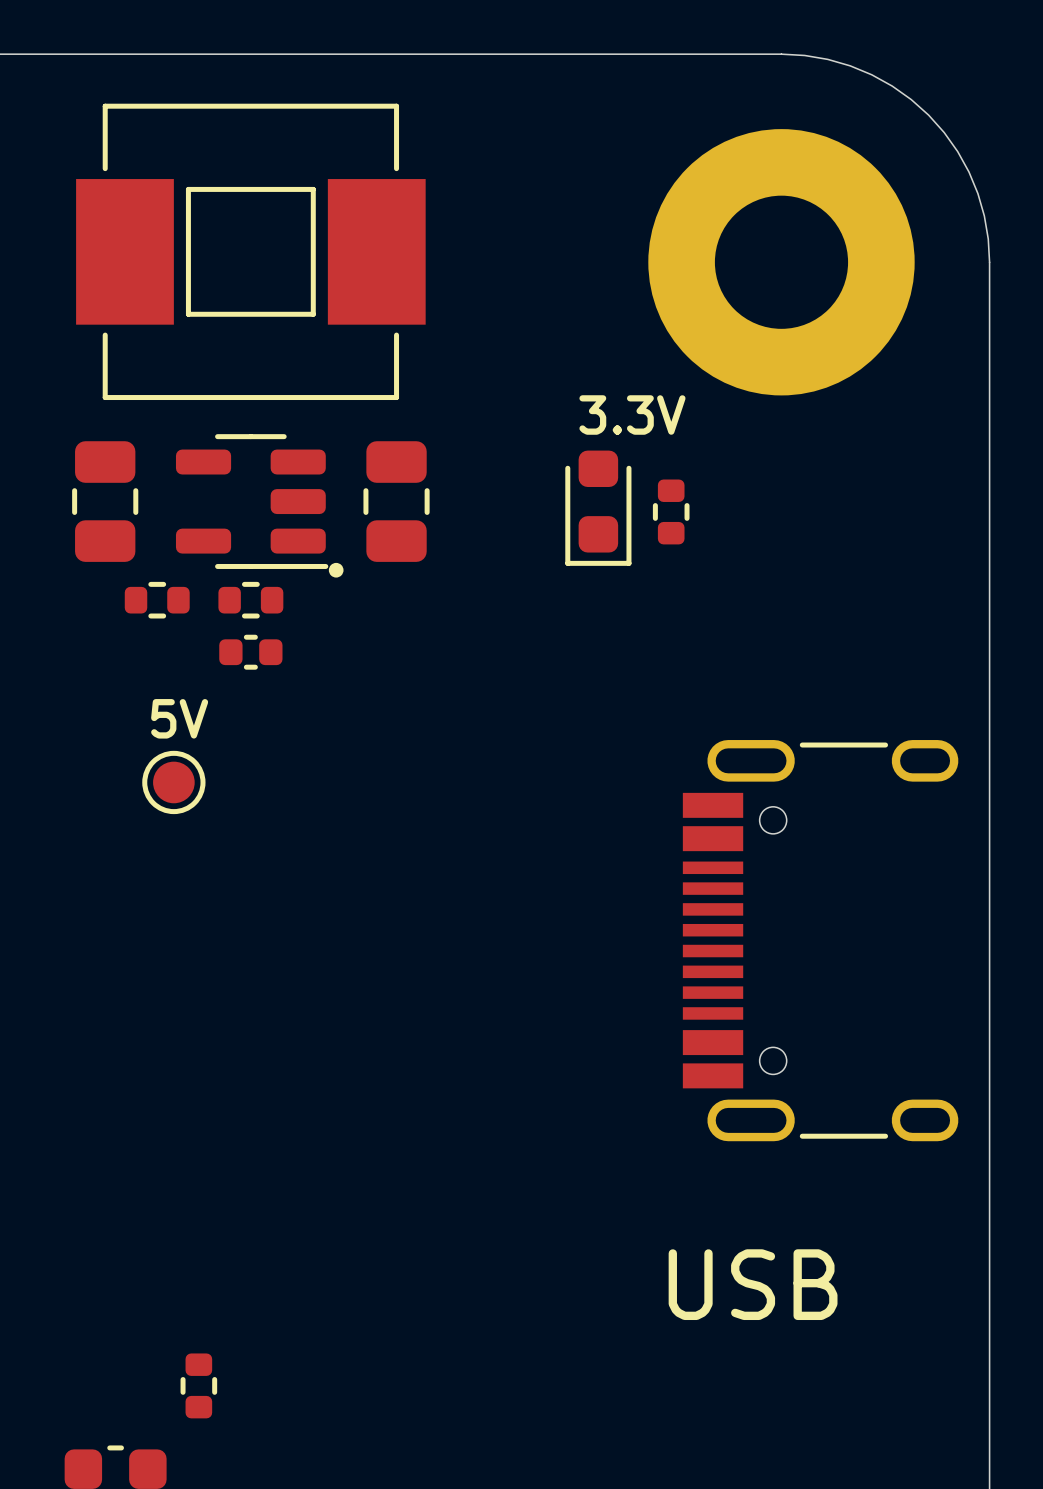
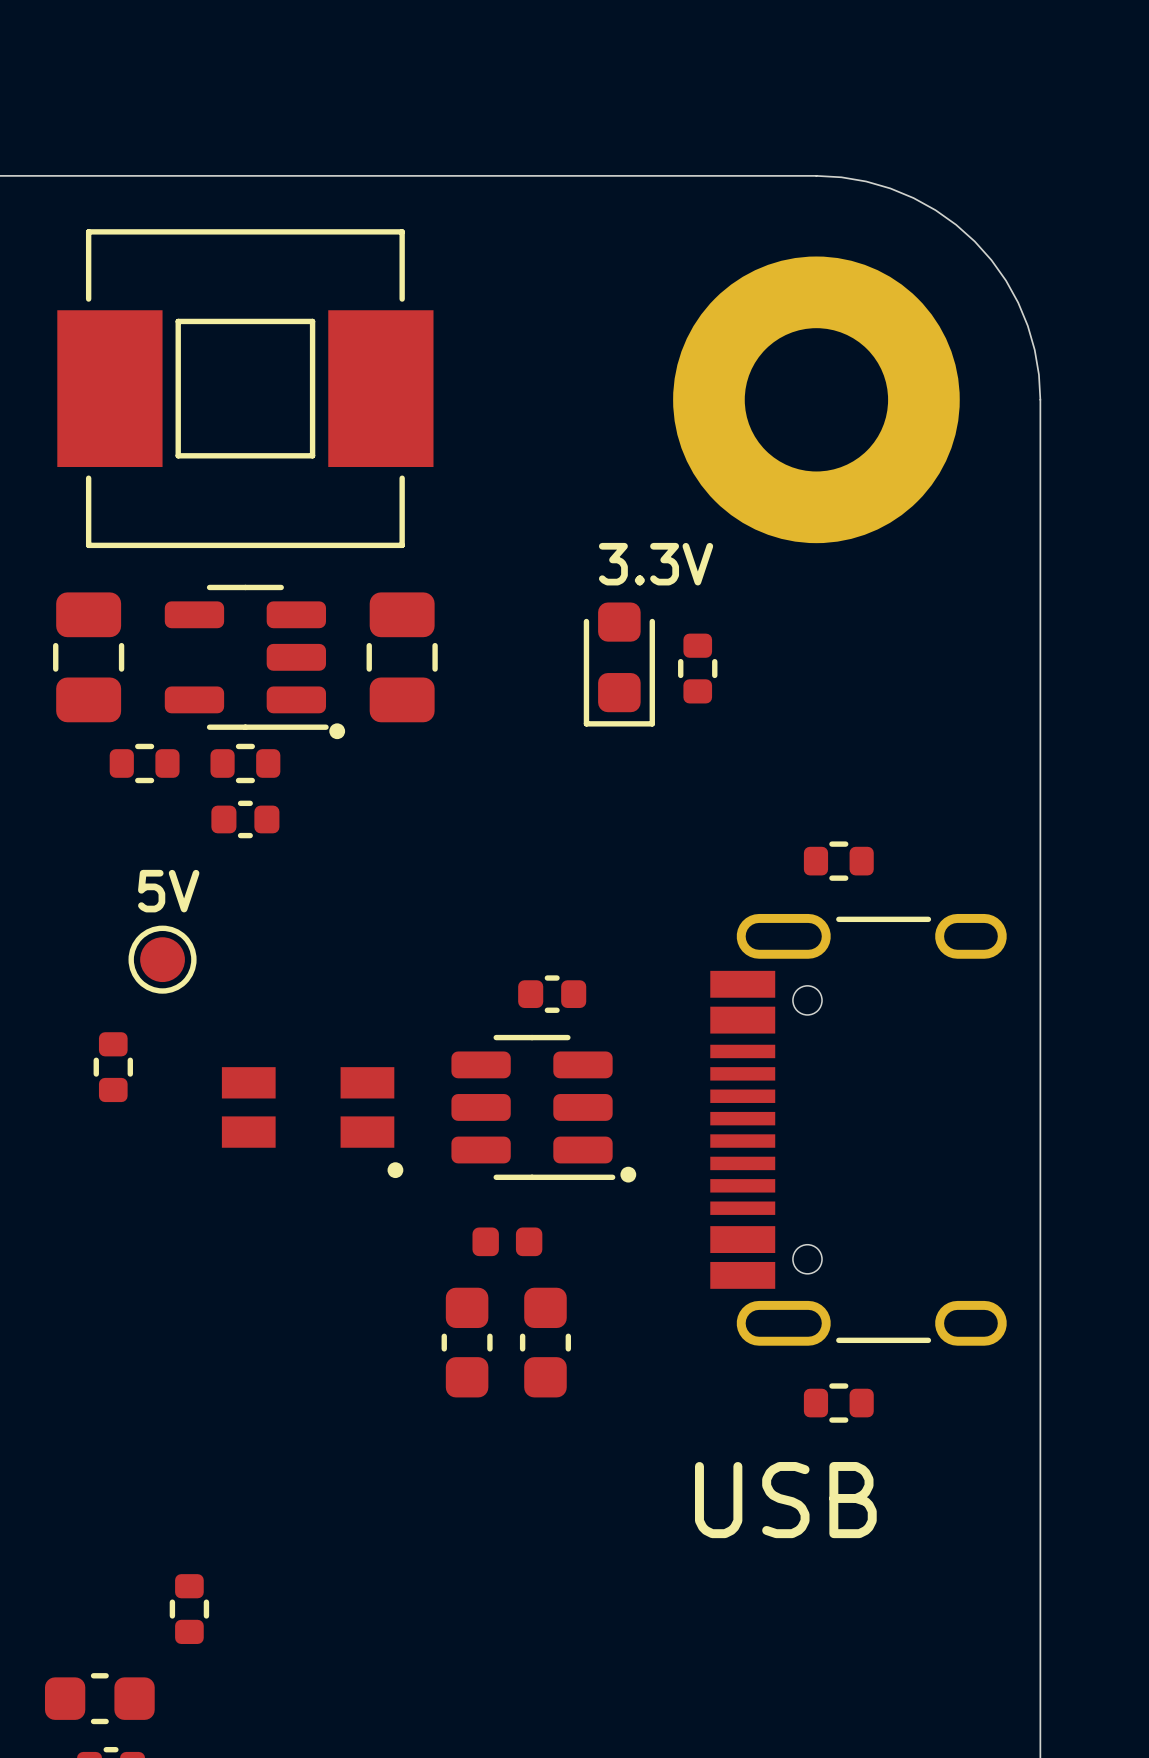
part: none -> (838, 861)
part: none -> (552, 994)
part: none -> (113, 1067)
part: none -> (308, 1107)
part: none -> (533, 1107)
drawing: none -> [387, 1162, 404, 1179]
drawing: none -> [620, 1166, 637, 1183]
part: none -> (507, 1241)
part: none -> (467, 1342)
part: none -> (545, 1342)
part: none -> (838, 1403)

